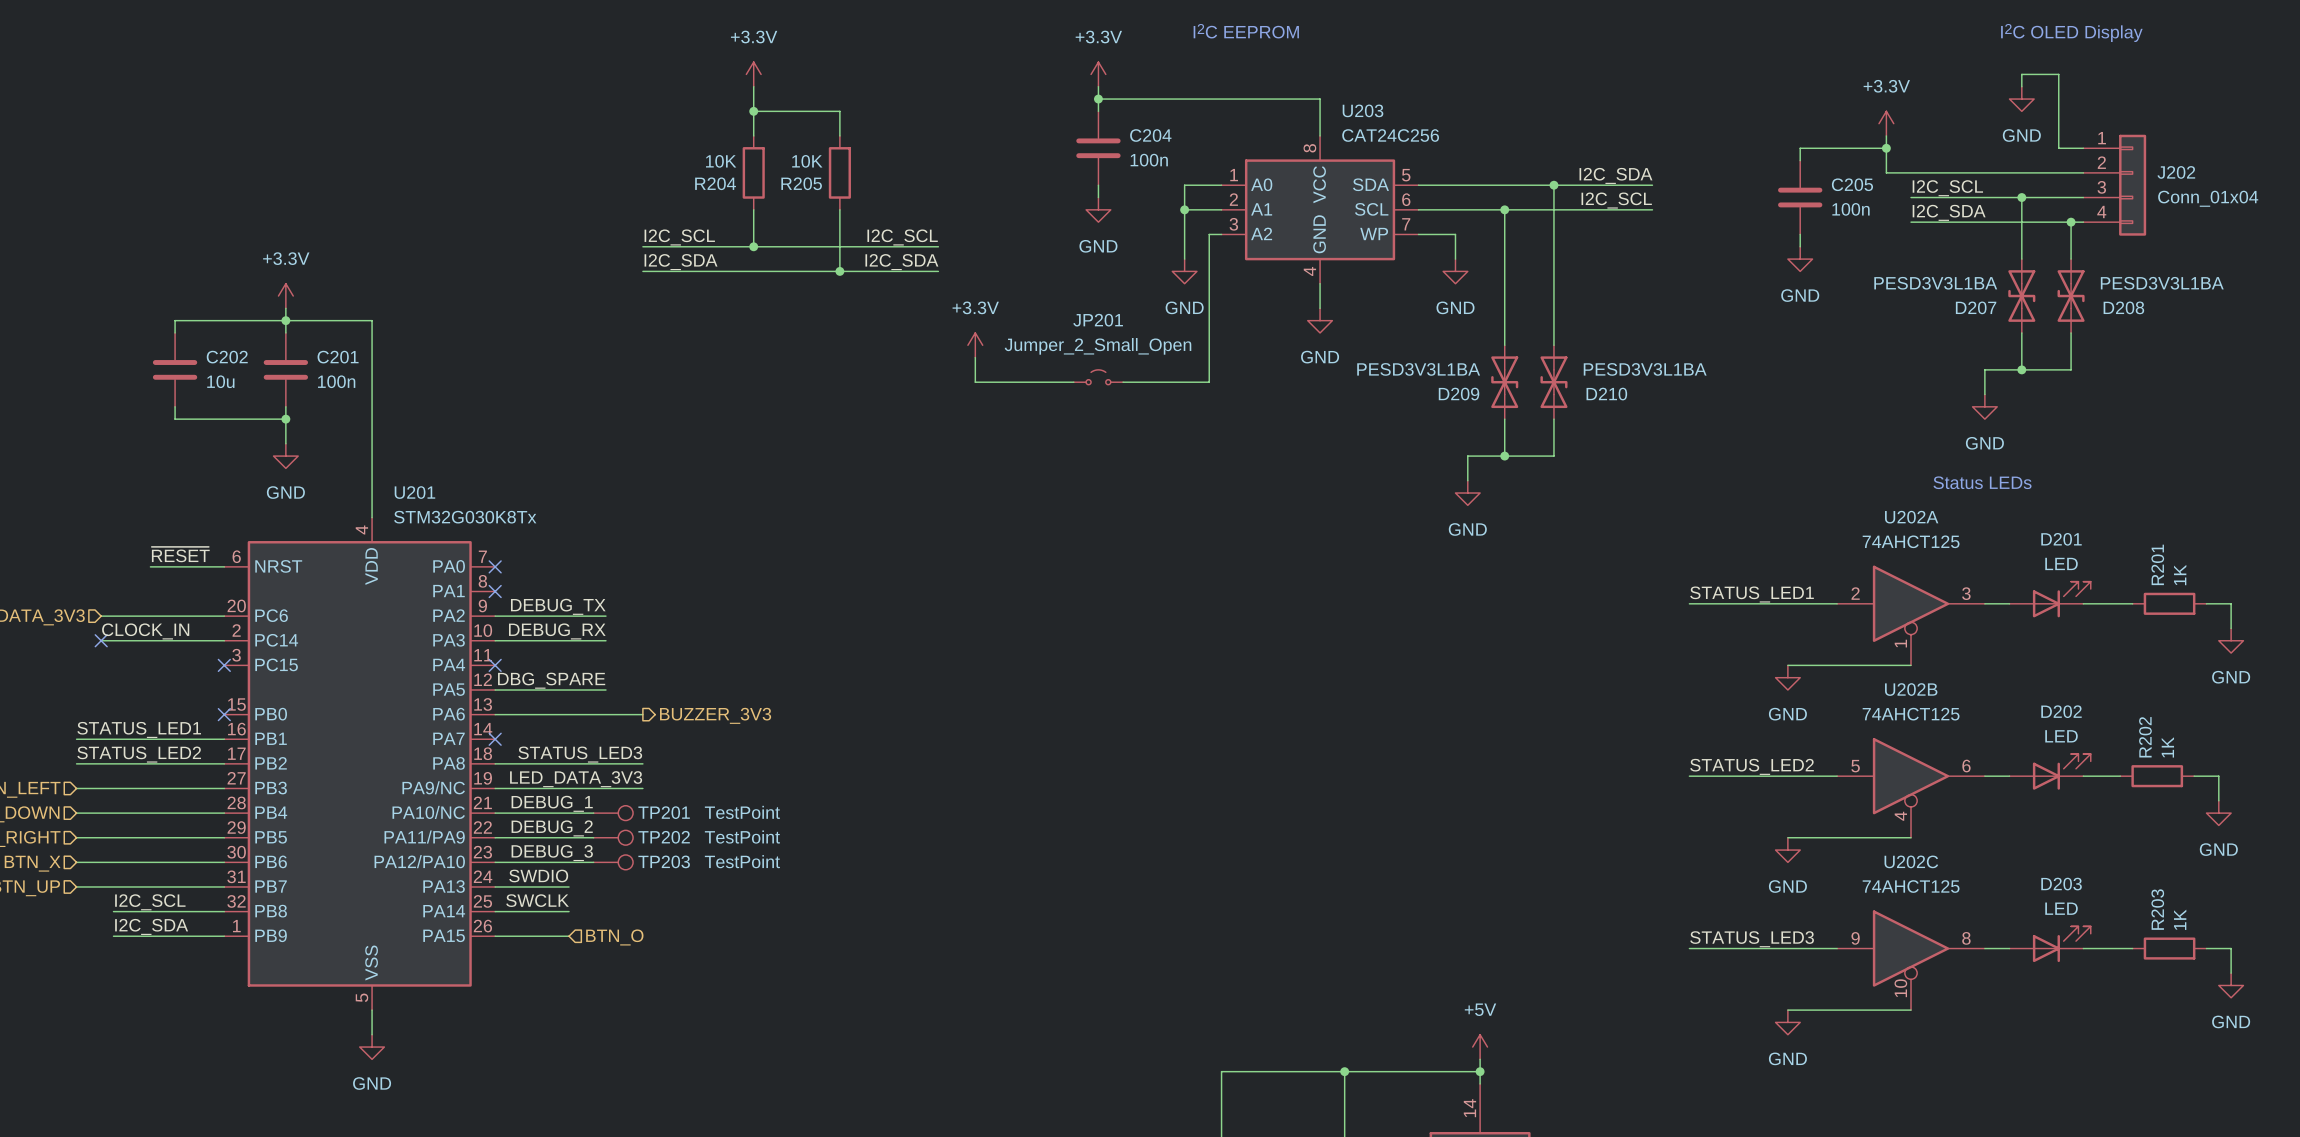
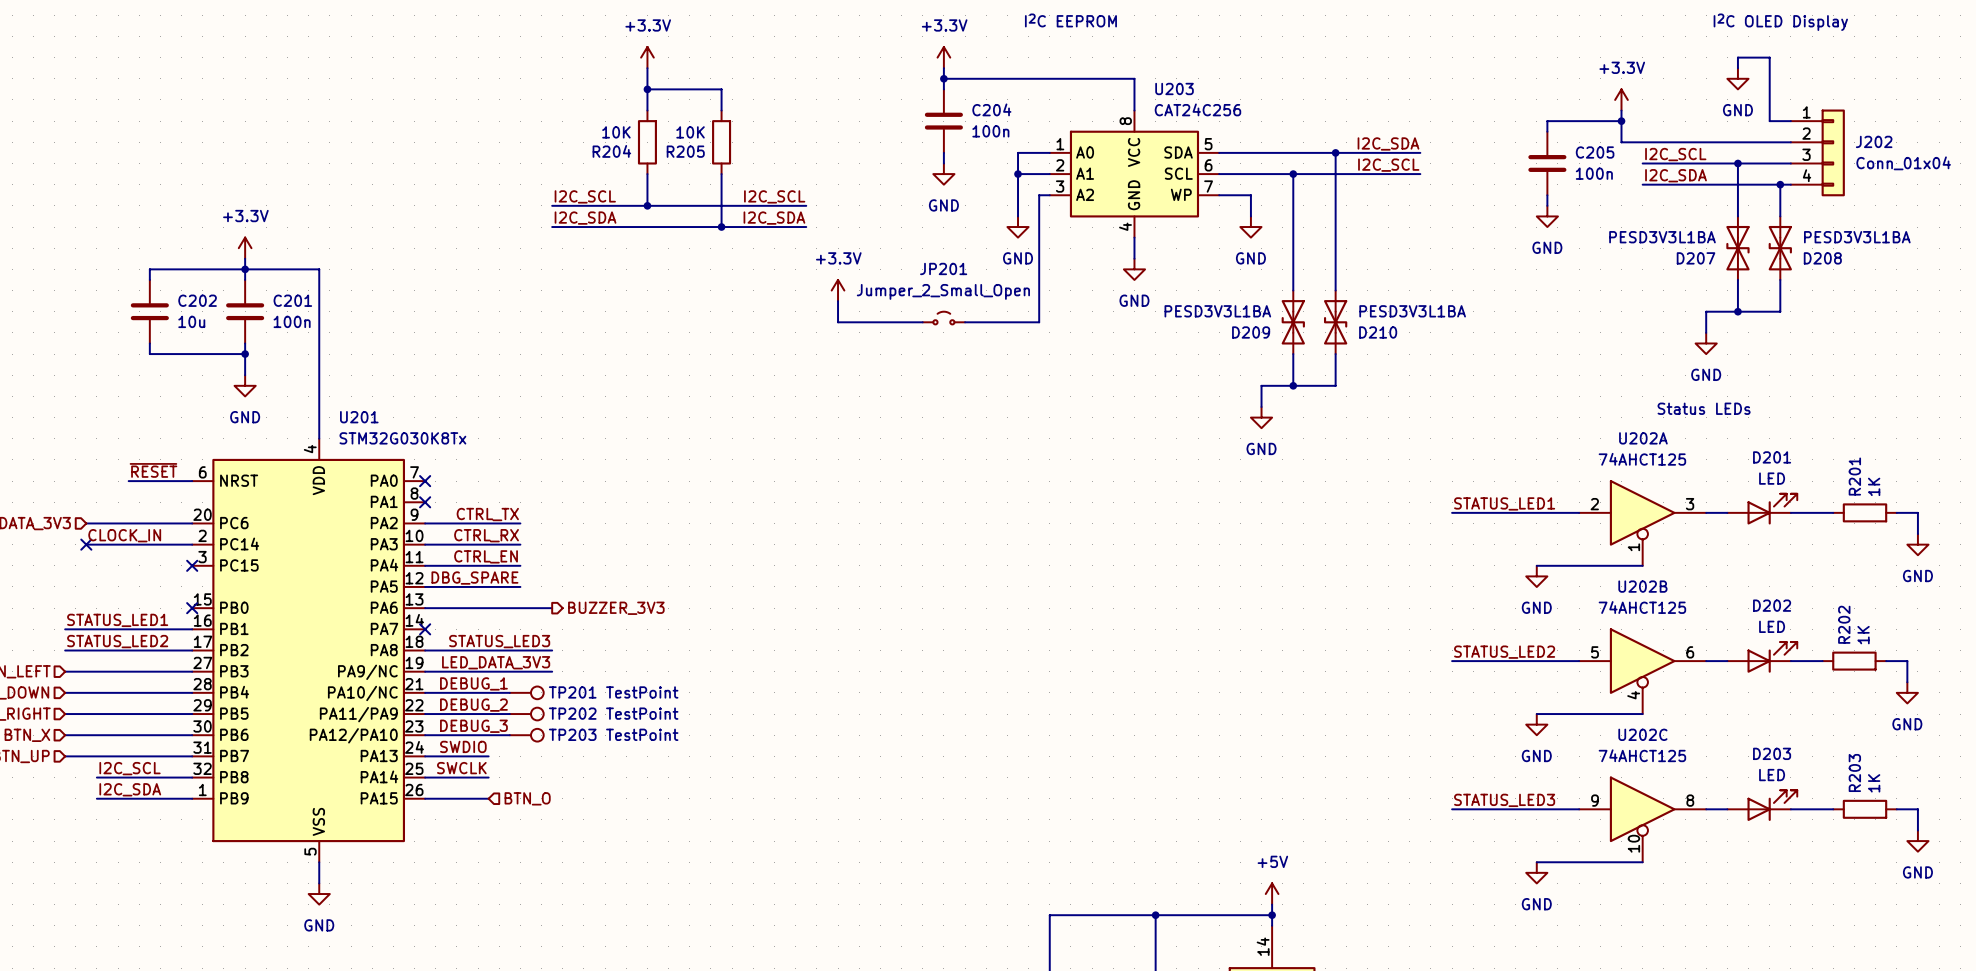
label: DEBUG_TX (558, 606) -> CTRL_TX (487, 514)
label: DEBUG_RX (557, 631) -> CTRL_RX (486, 535)
label: none -> CTRL_EN (486, 556)
wire: none -> (425, 565) (520, 565)
no-connect mark: (495, 665) -> none

